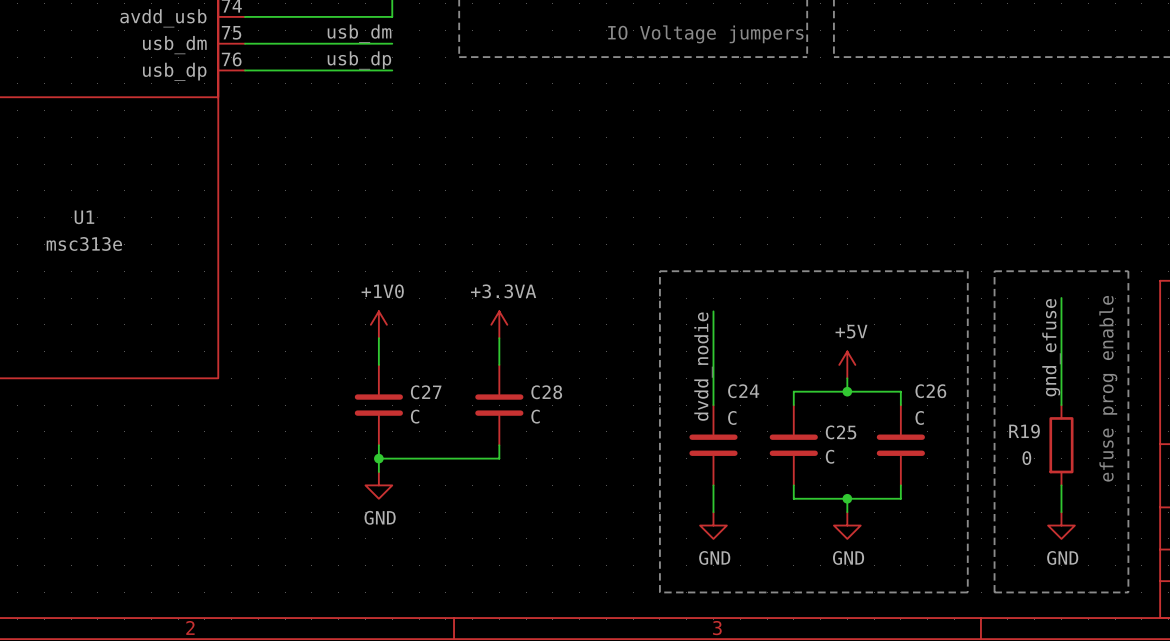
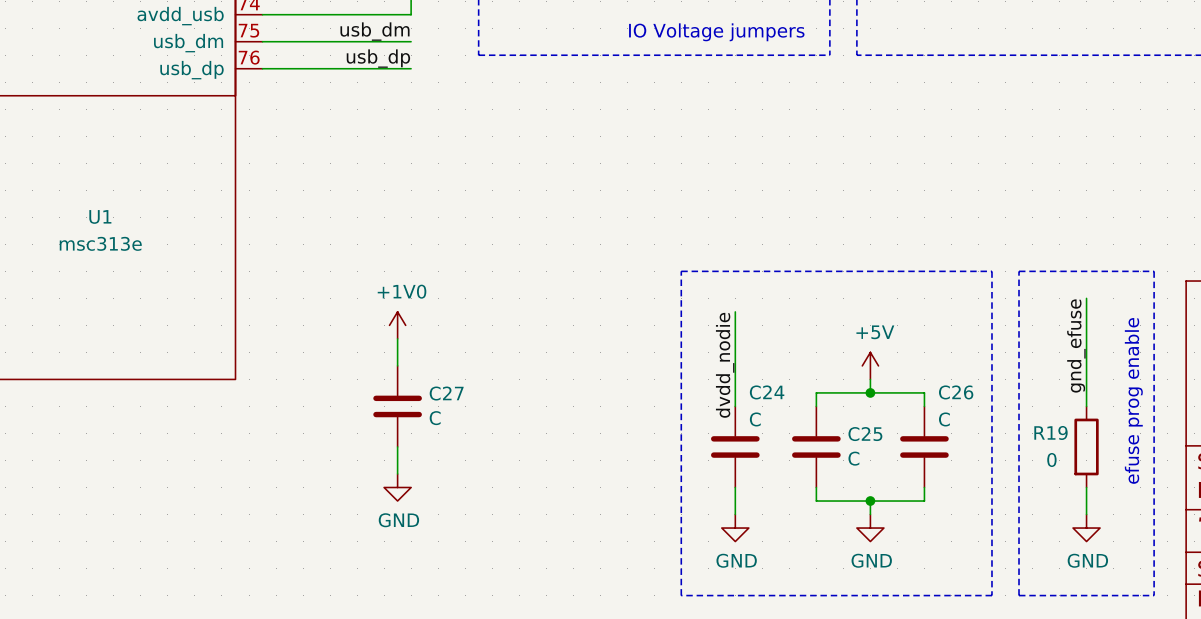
power symbol: +3.3VA (499, 324) -> none
wire: (499, 338) (499, 364) -> none
C28: C (499, 405) -> none
wire: (499, 445) (499, 458) (378, 458) -> none
junction: (378, 458) -> none

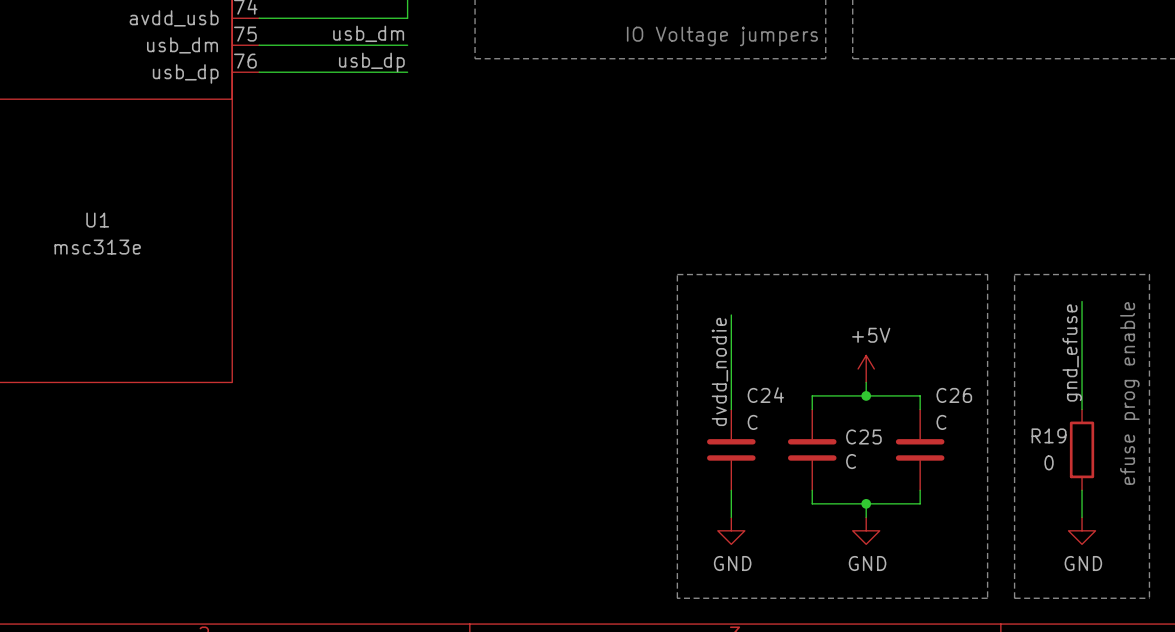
power symbol: +1V0 (397, 325) -> none
wire: (397, 338) (397, 365) -> none
C27: C (397, 406) -> none
wire: (397, 446) (397, 473) -> none
power symbol: GND (397, 487) -> none

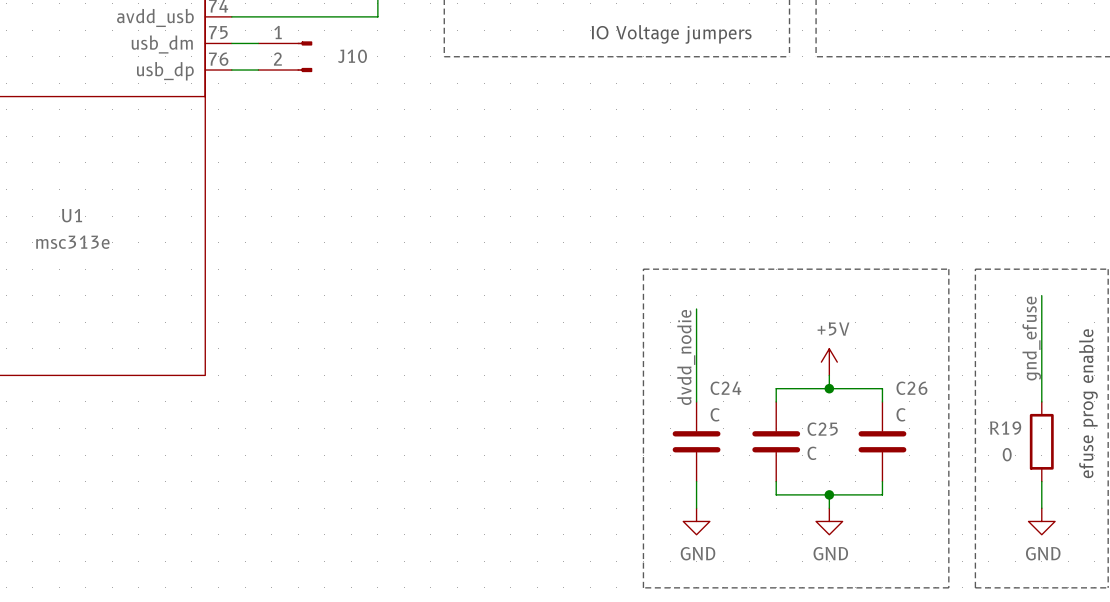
label: usb_dm (368, 33) -> none
wire: (286, 45) (407, 45) -> none
J10: none -> (285, 56)
label: usb_dp (371, 62) -> none
wire: (286, 72) (407, 72) -> none

